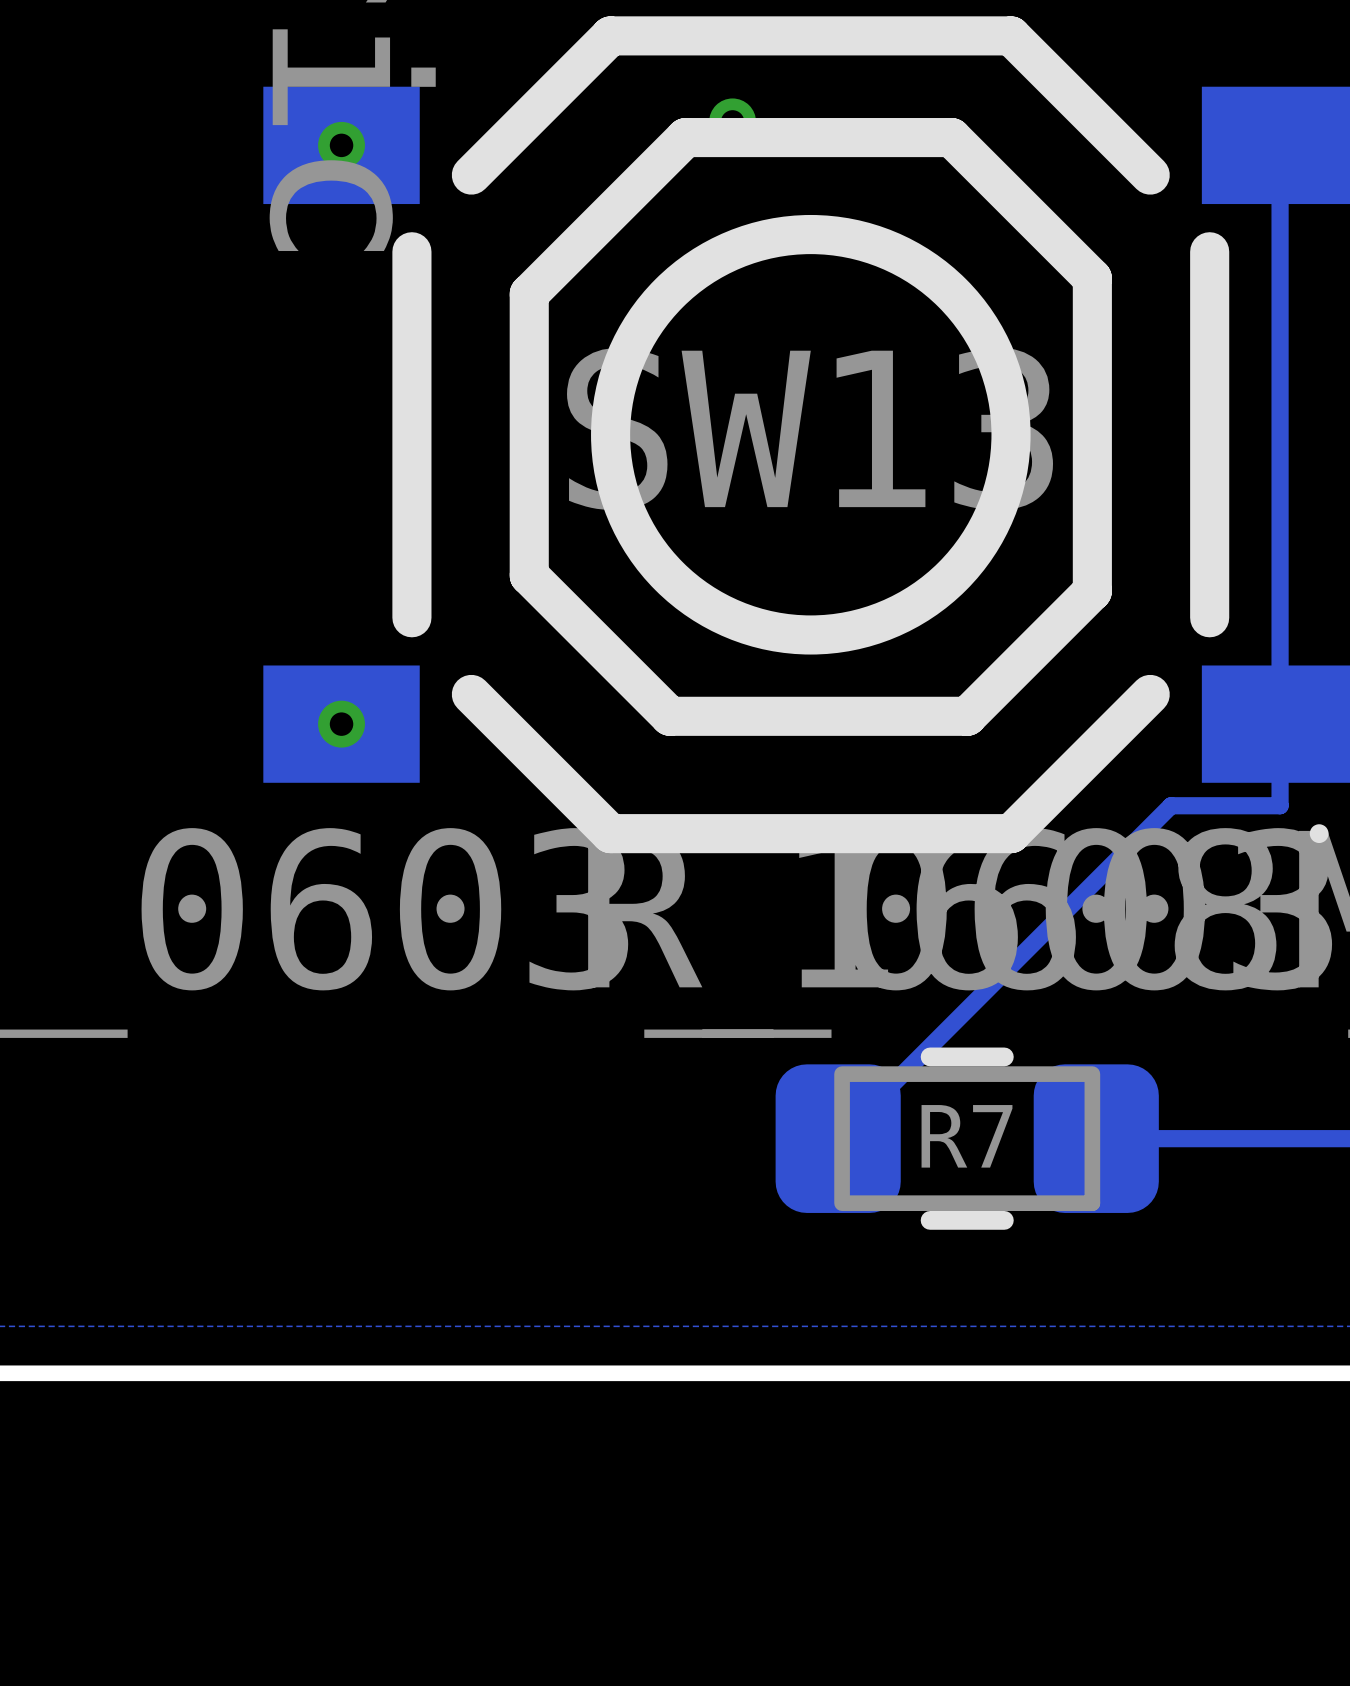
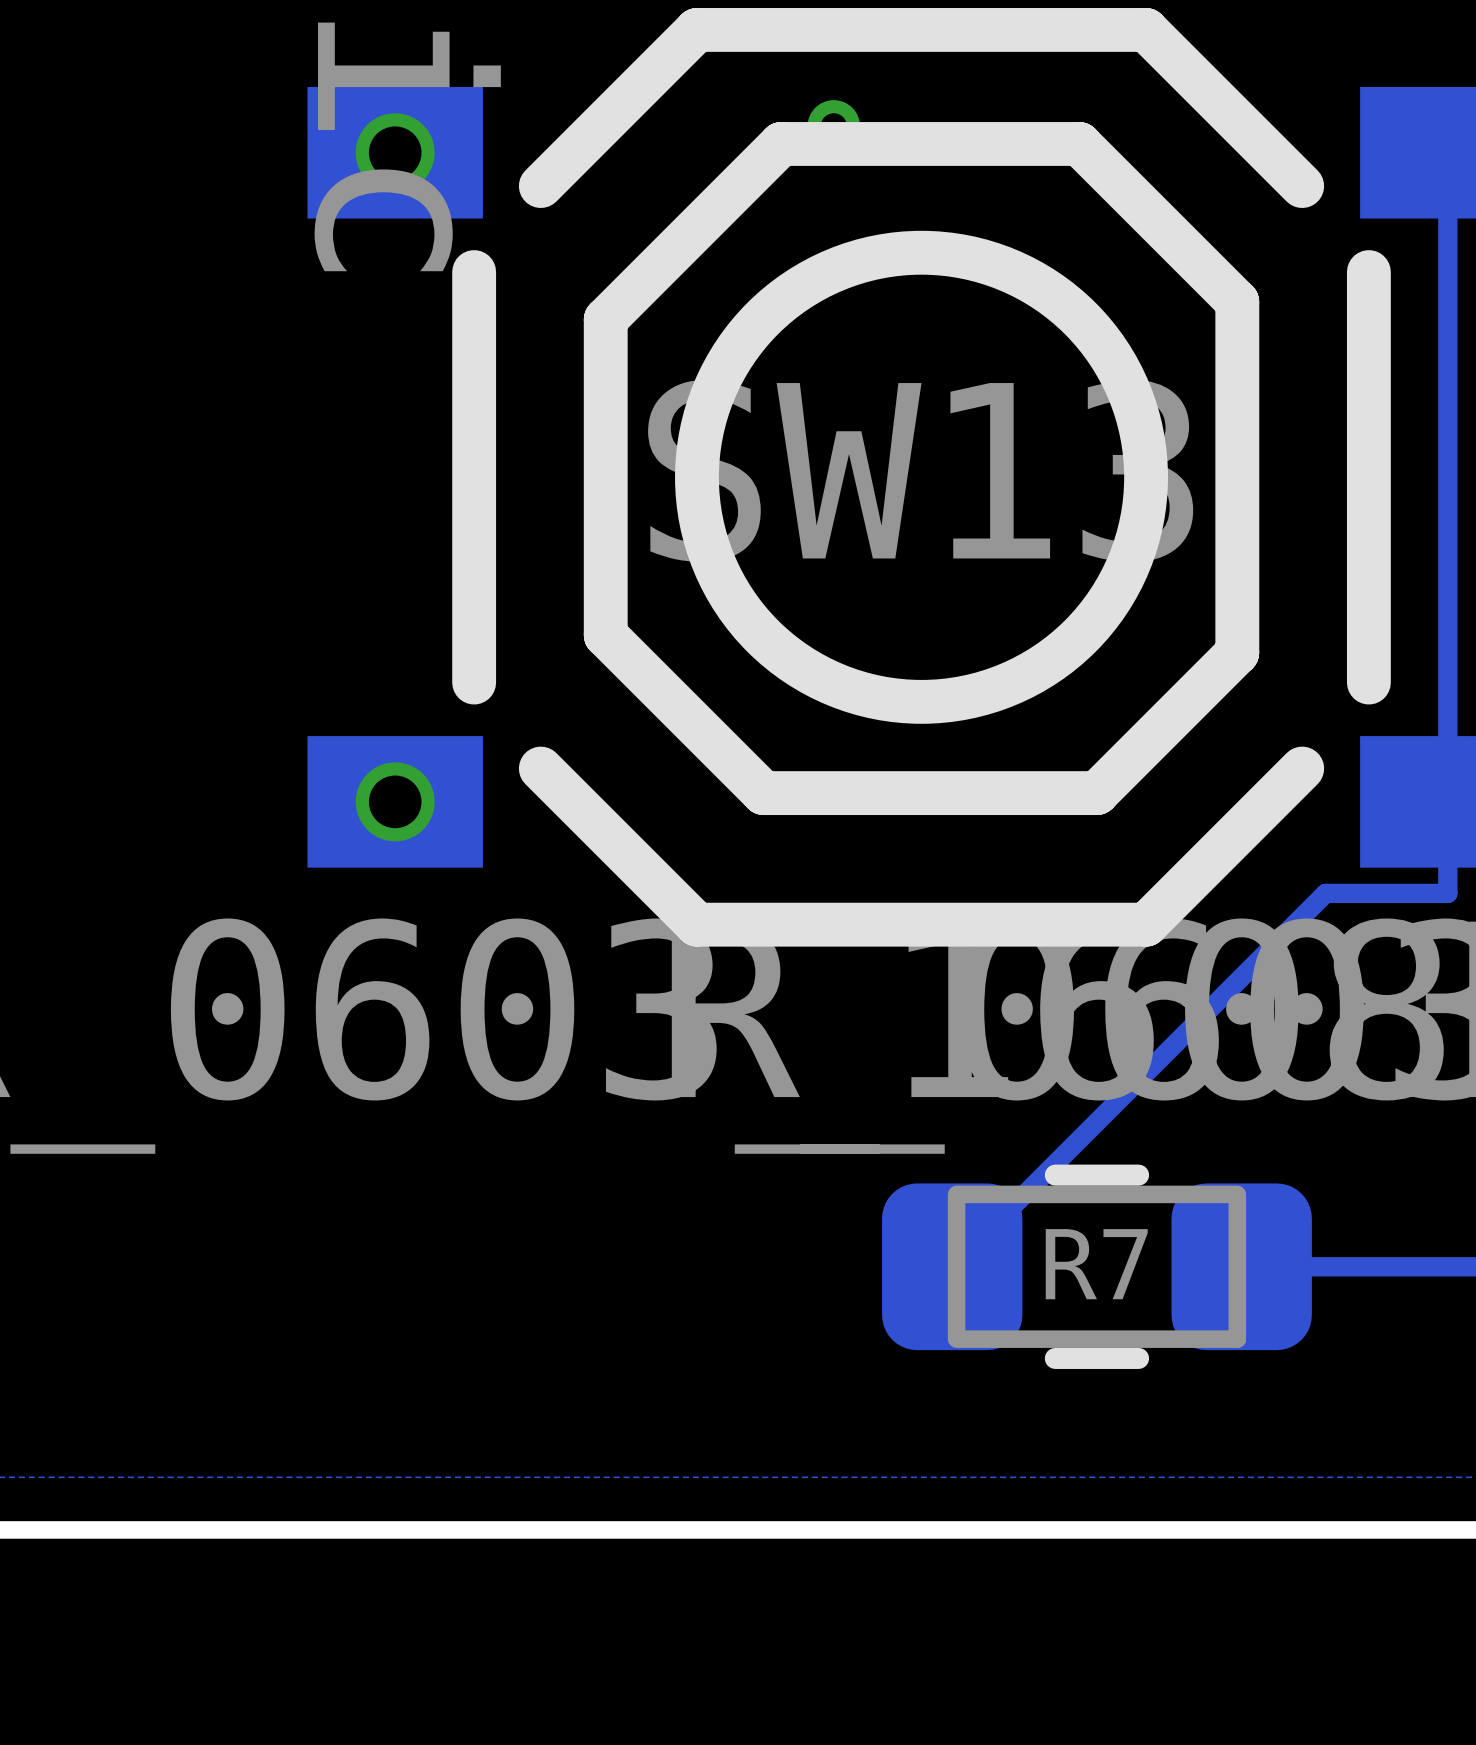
via size: [318, 121, 366, 169] -> [355, 113, 435, 193]
via size: [318, 700, 366, 748] -> [355, 762, 435, 842]

